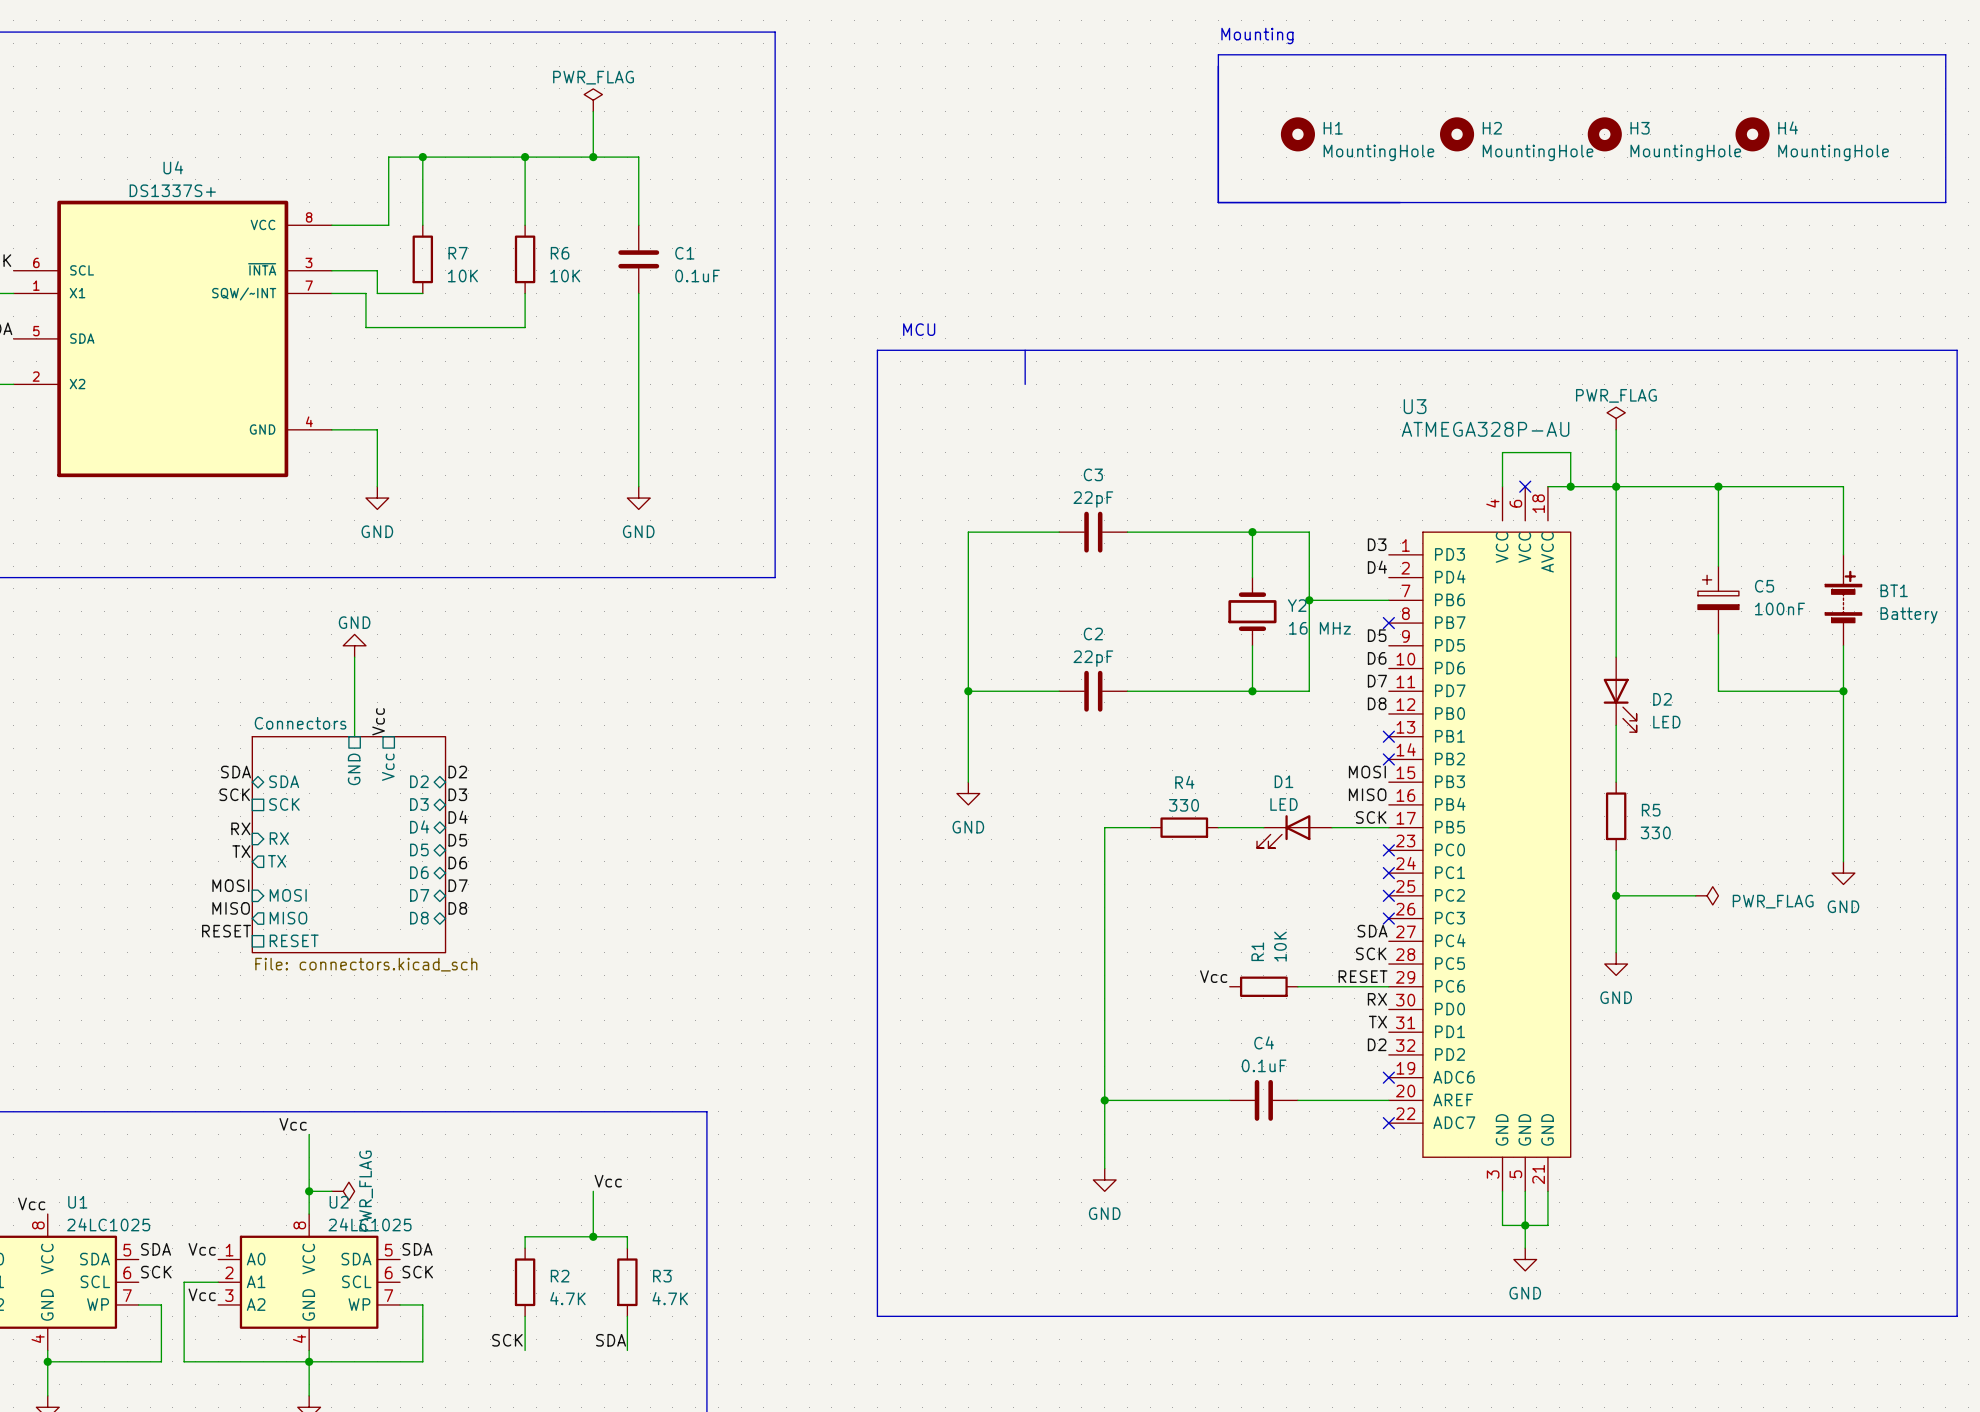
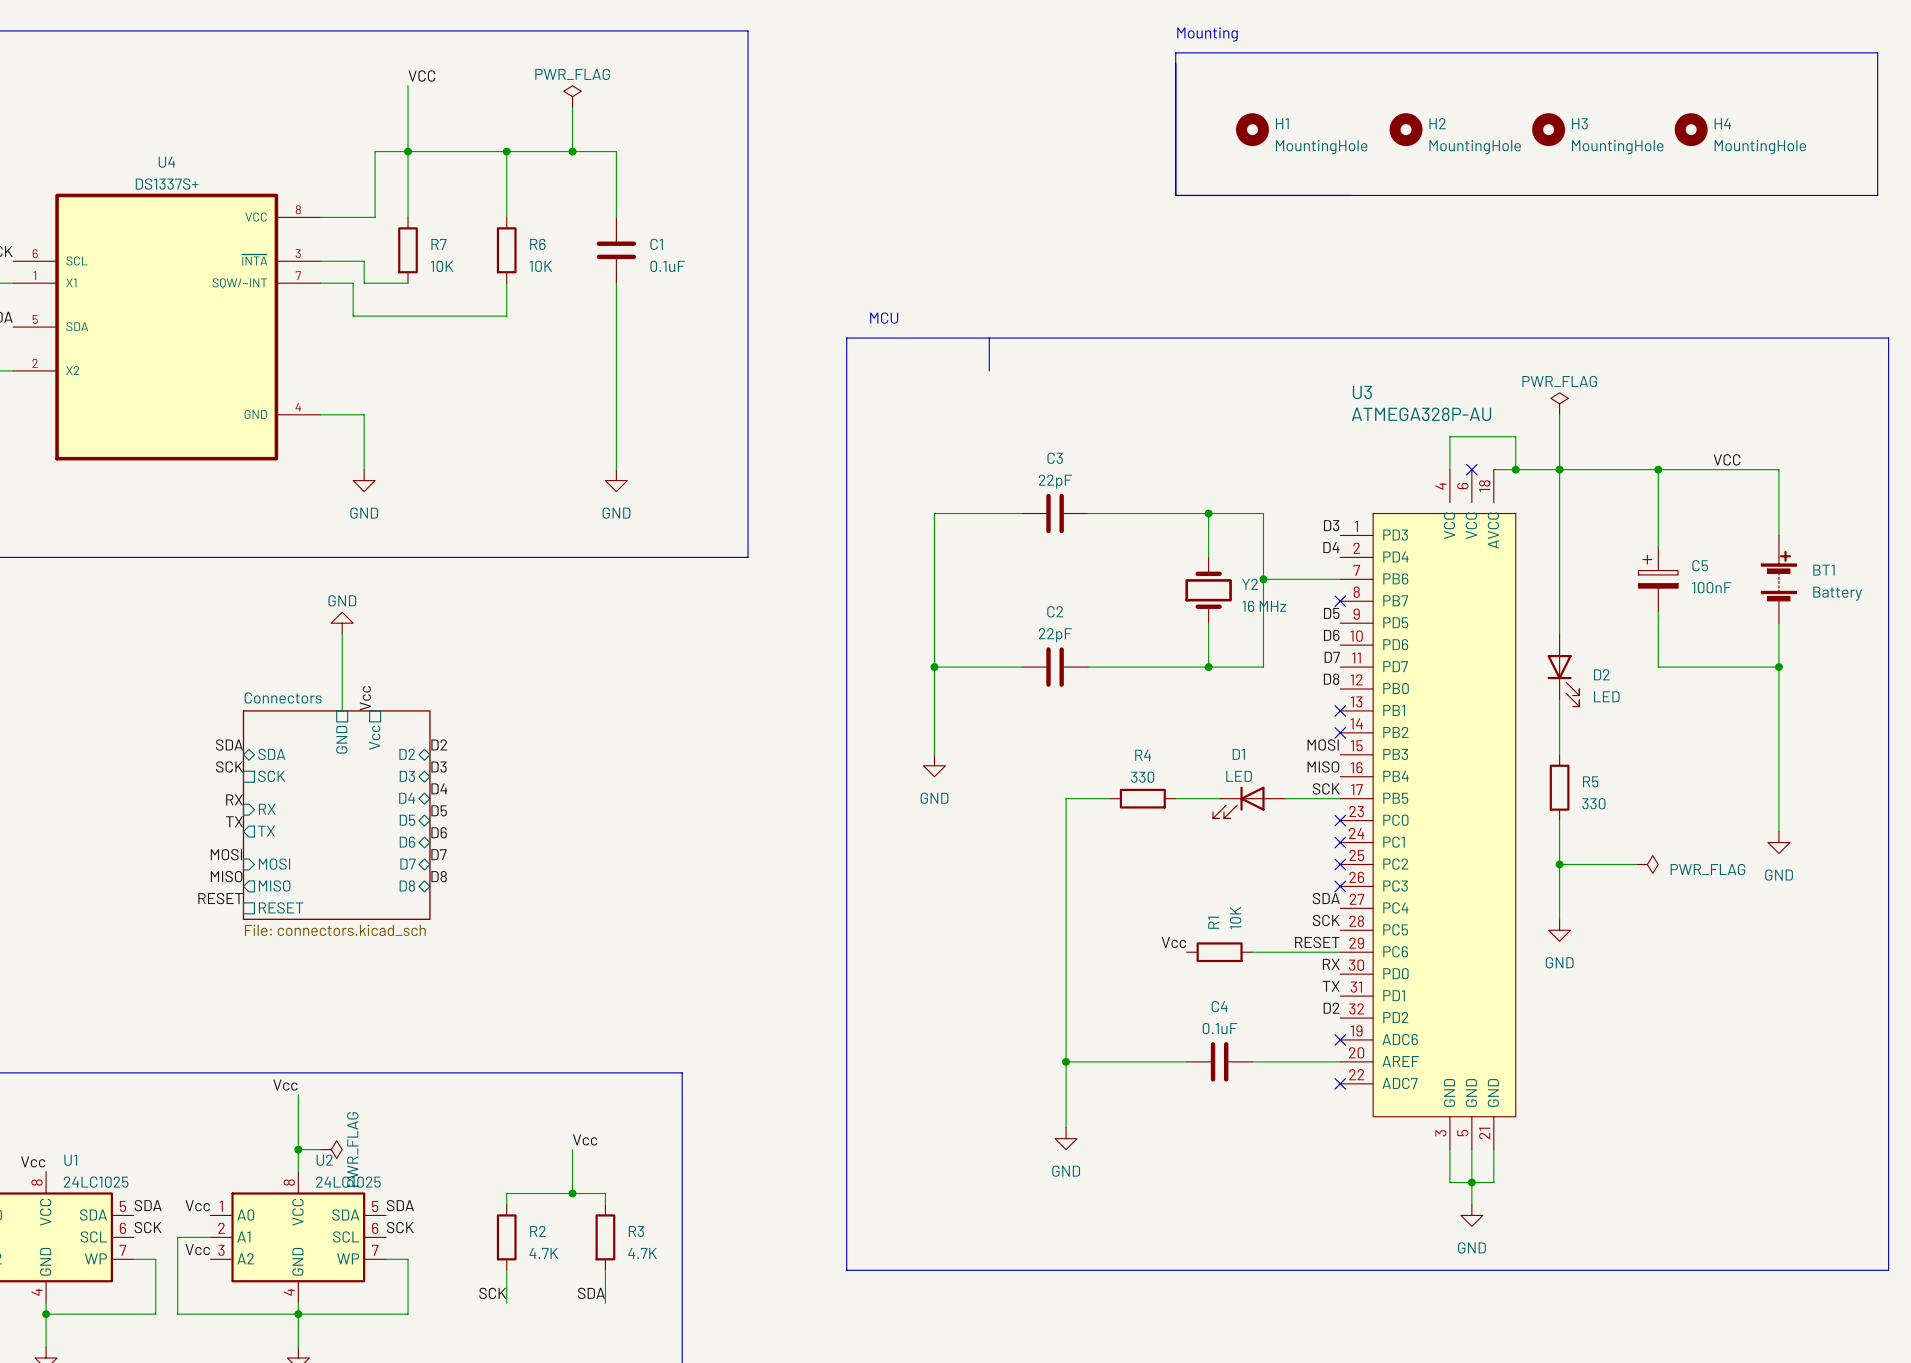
label: none -> VCC (421, 76)
wire: none -> (408, 85) (408, 151)
label: none -> VCC (1727, 459)

